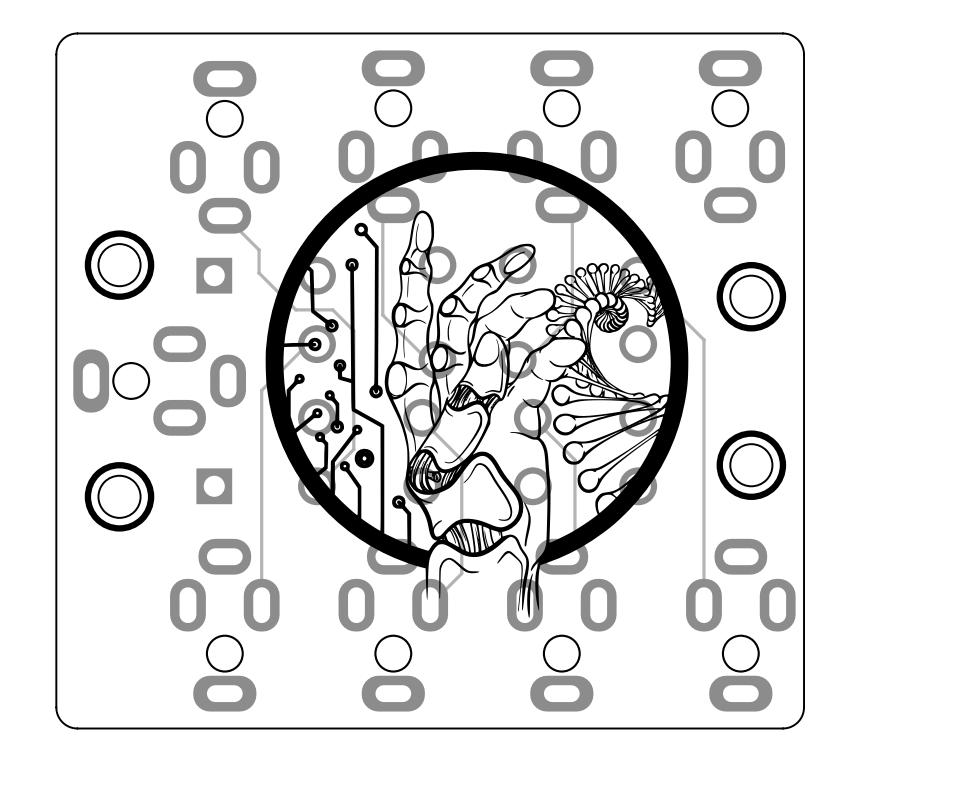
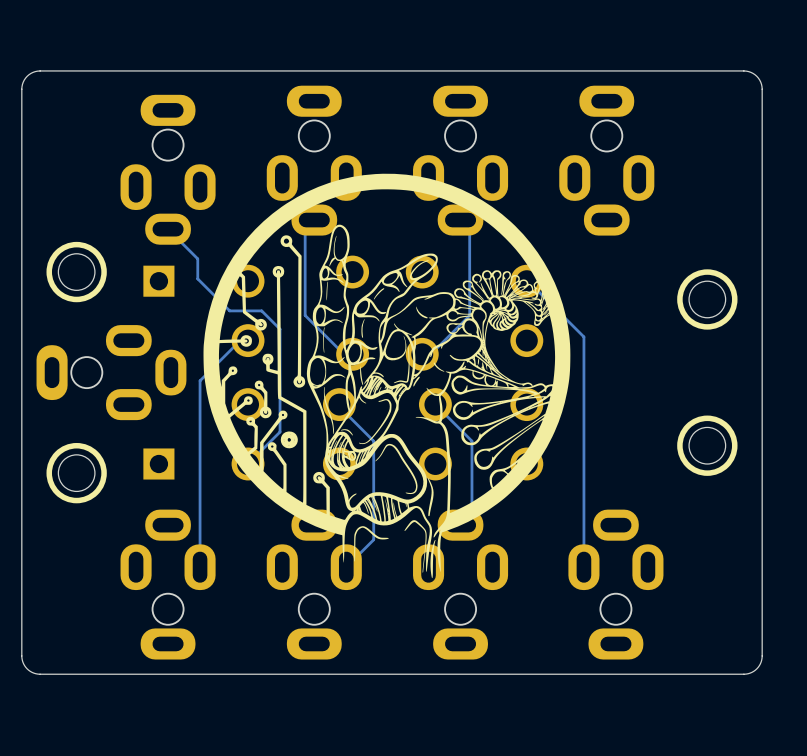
board edge: (782, 33) (791, 35) (797, 39) (802, 46) (804, 54) (804, 707) (802, 715) (797, 722) (791, 726) (782, 728) -> (652, 70) (746, 71) (756, 76) (762, 86) (762, 655) (758, 667) (745, 674) (652, 674)
drawing position: (751, 296) -> (707, 299)
round board edge position: (751, 296) -> (707, 299)
drawing position: (751, 465) -> (707, 445)
round board edge position: (751, 465) -> (707, 445)

